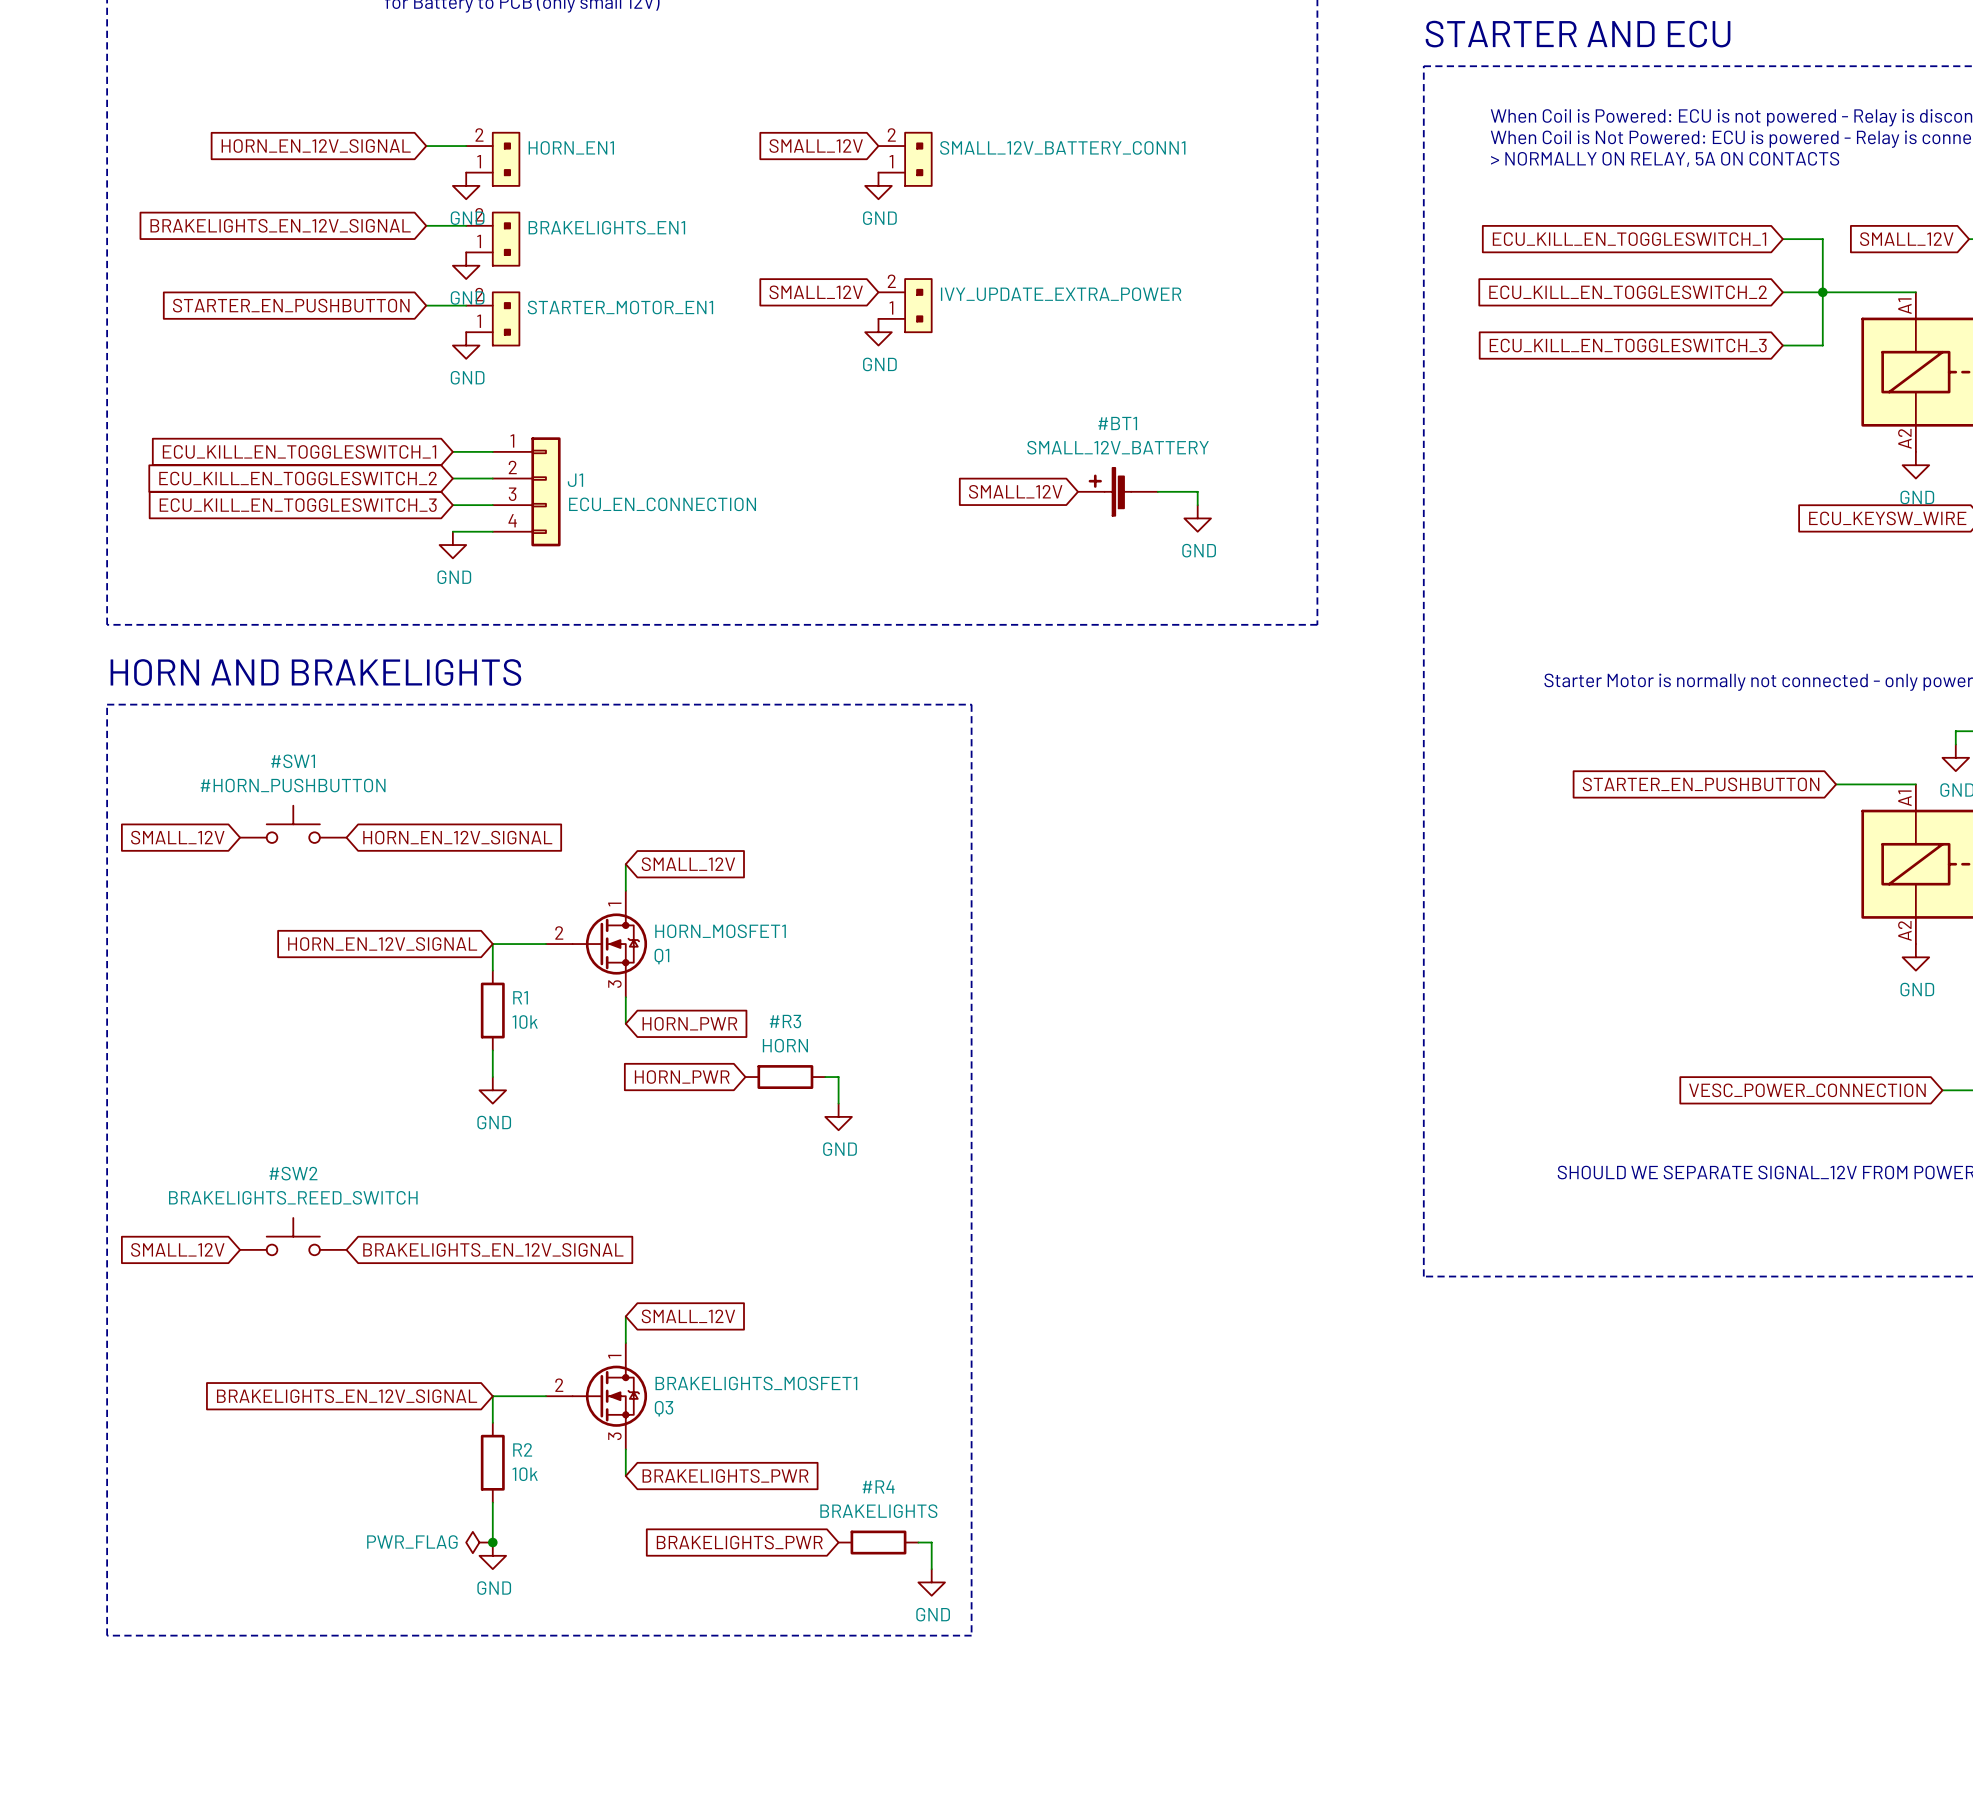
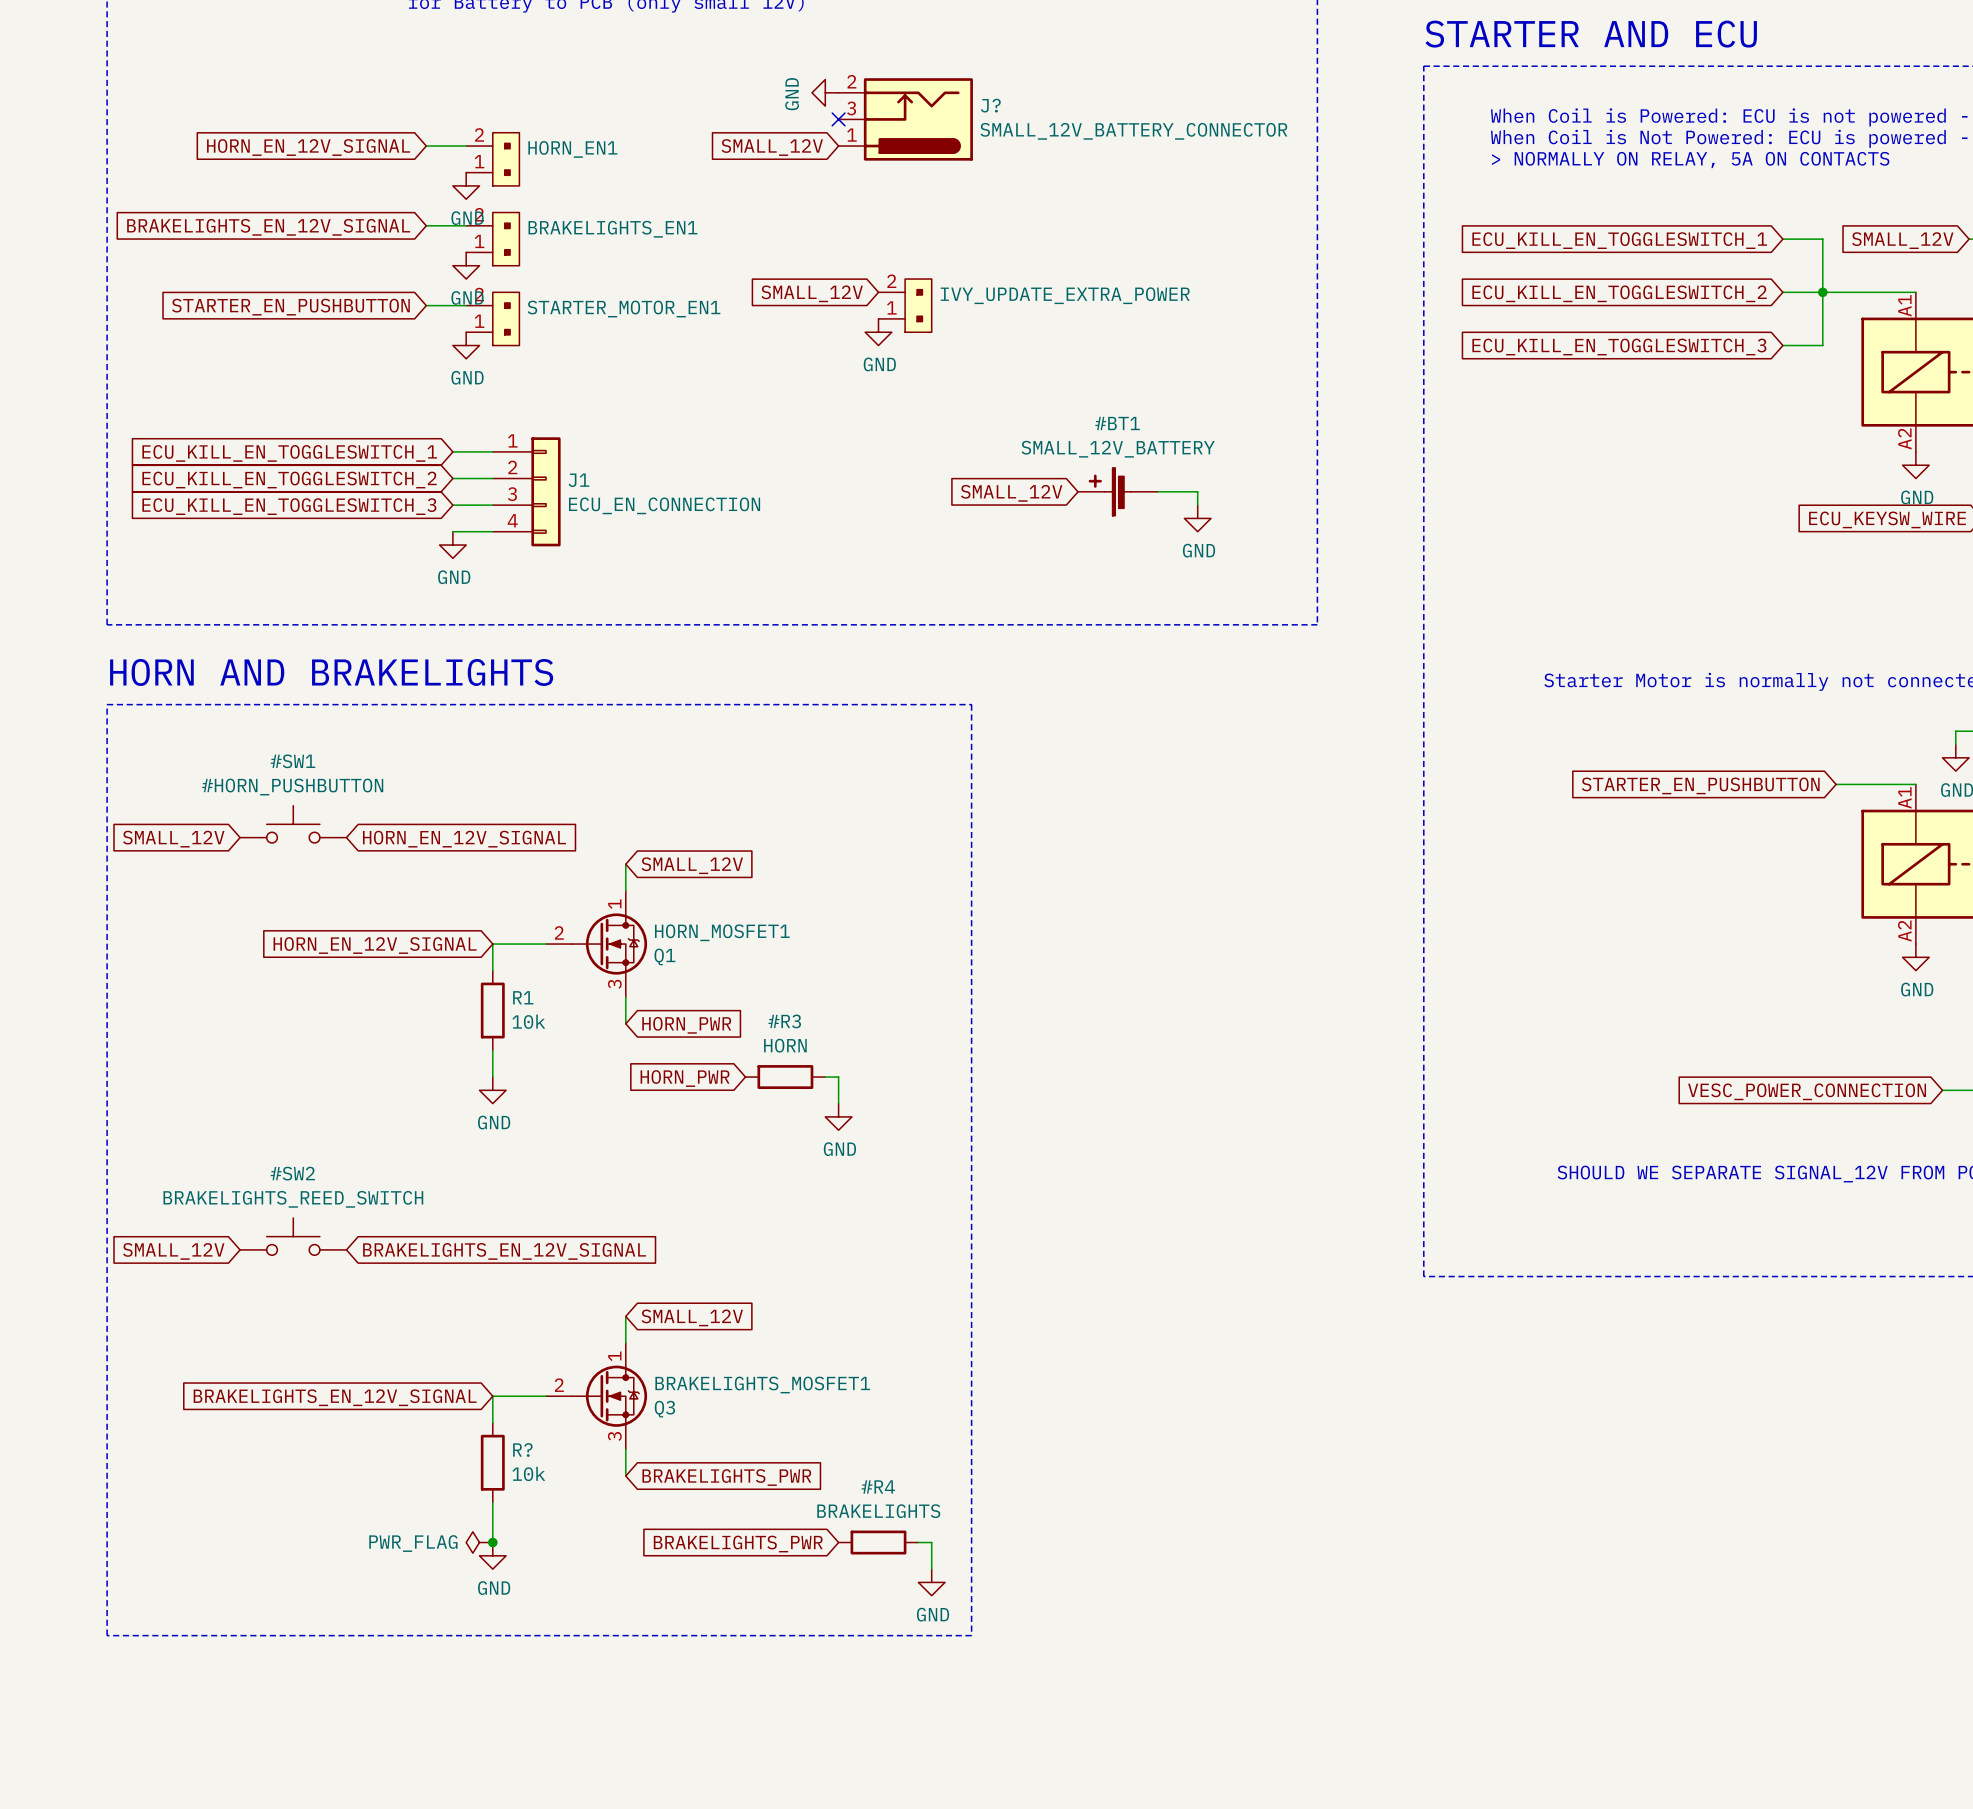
no-connect mark: none -> (838, 119)
J?: none -> SMALL_12V_BATTERY_CONNECTOR (905, 119)
global label position: SMALL_12V (816, 146) -> SMALL_12V (772, 147)
SMALL_12V_BATTERY_CONN1: (905, 159) -> none
power symbol rotation: 0° (878, 185) -> 90° clockwise (825, 92)
power symbol position: GND (878, 185) -> GND (825, 92)
R2 name: R2 (522, 1449) -> R? (522, 1449)

